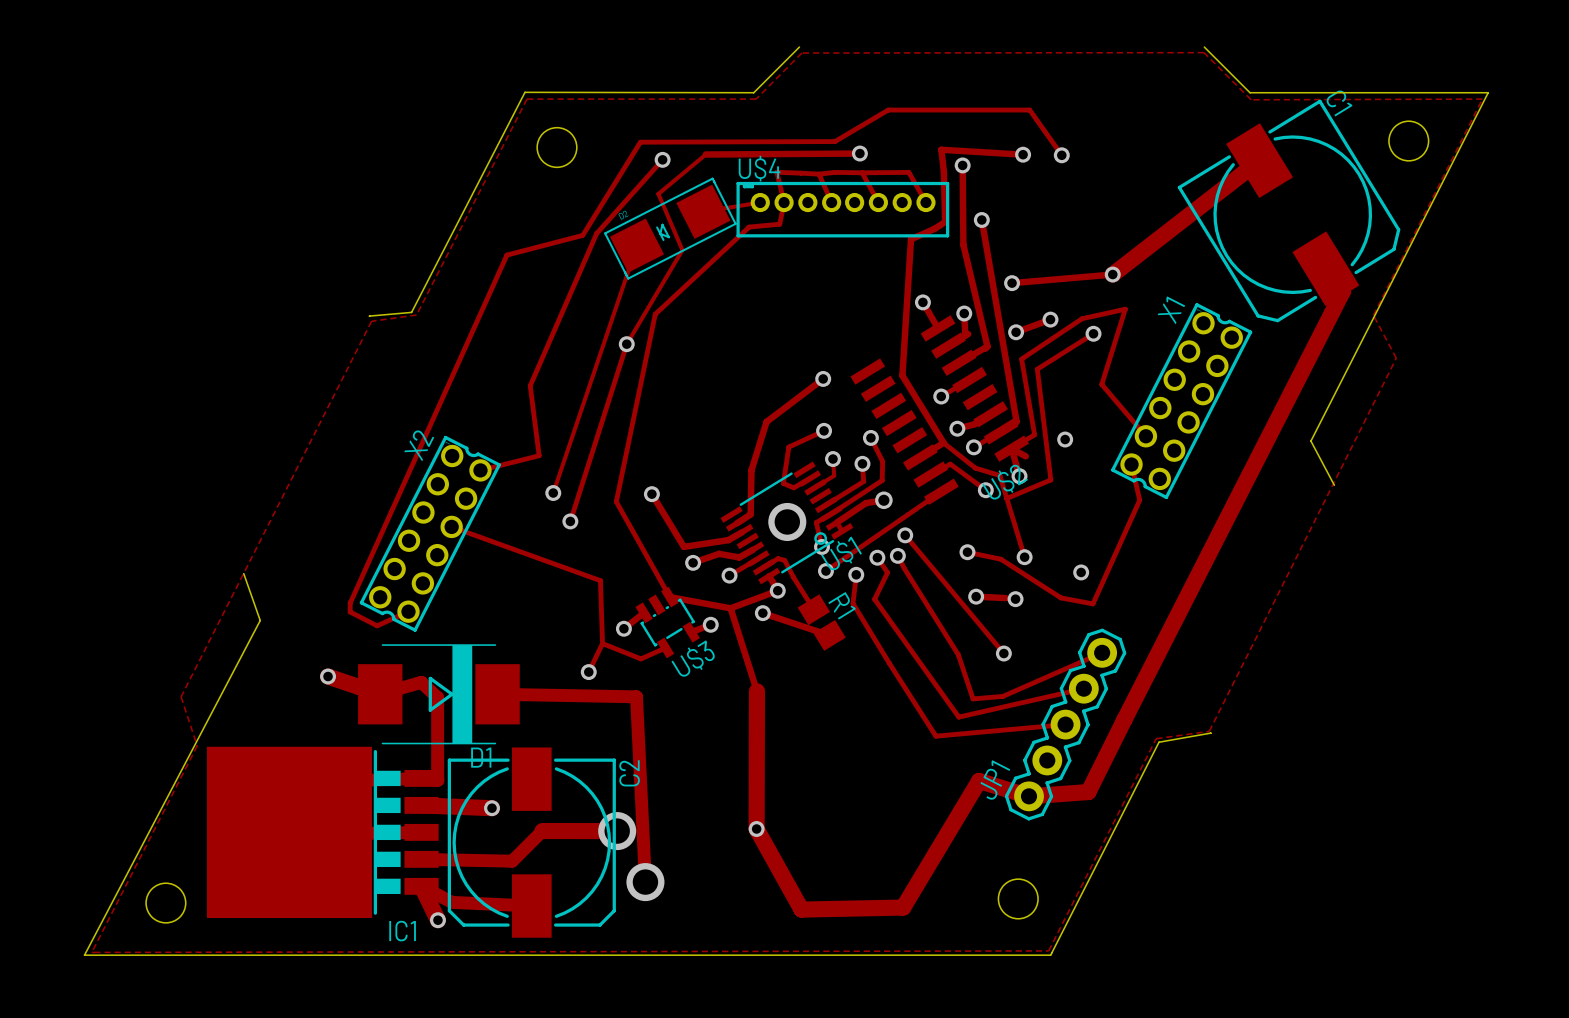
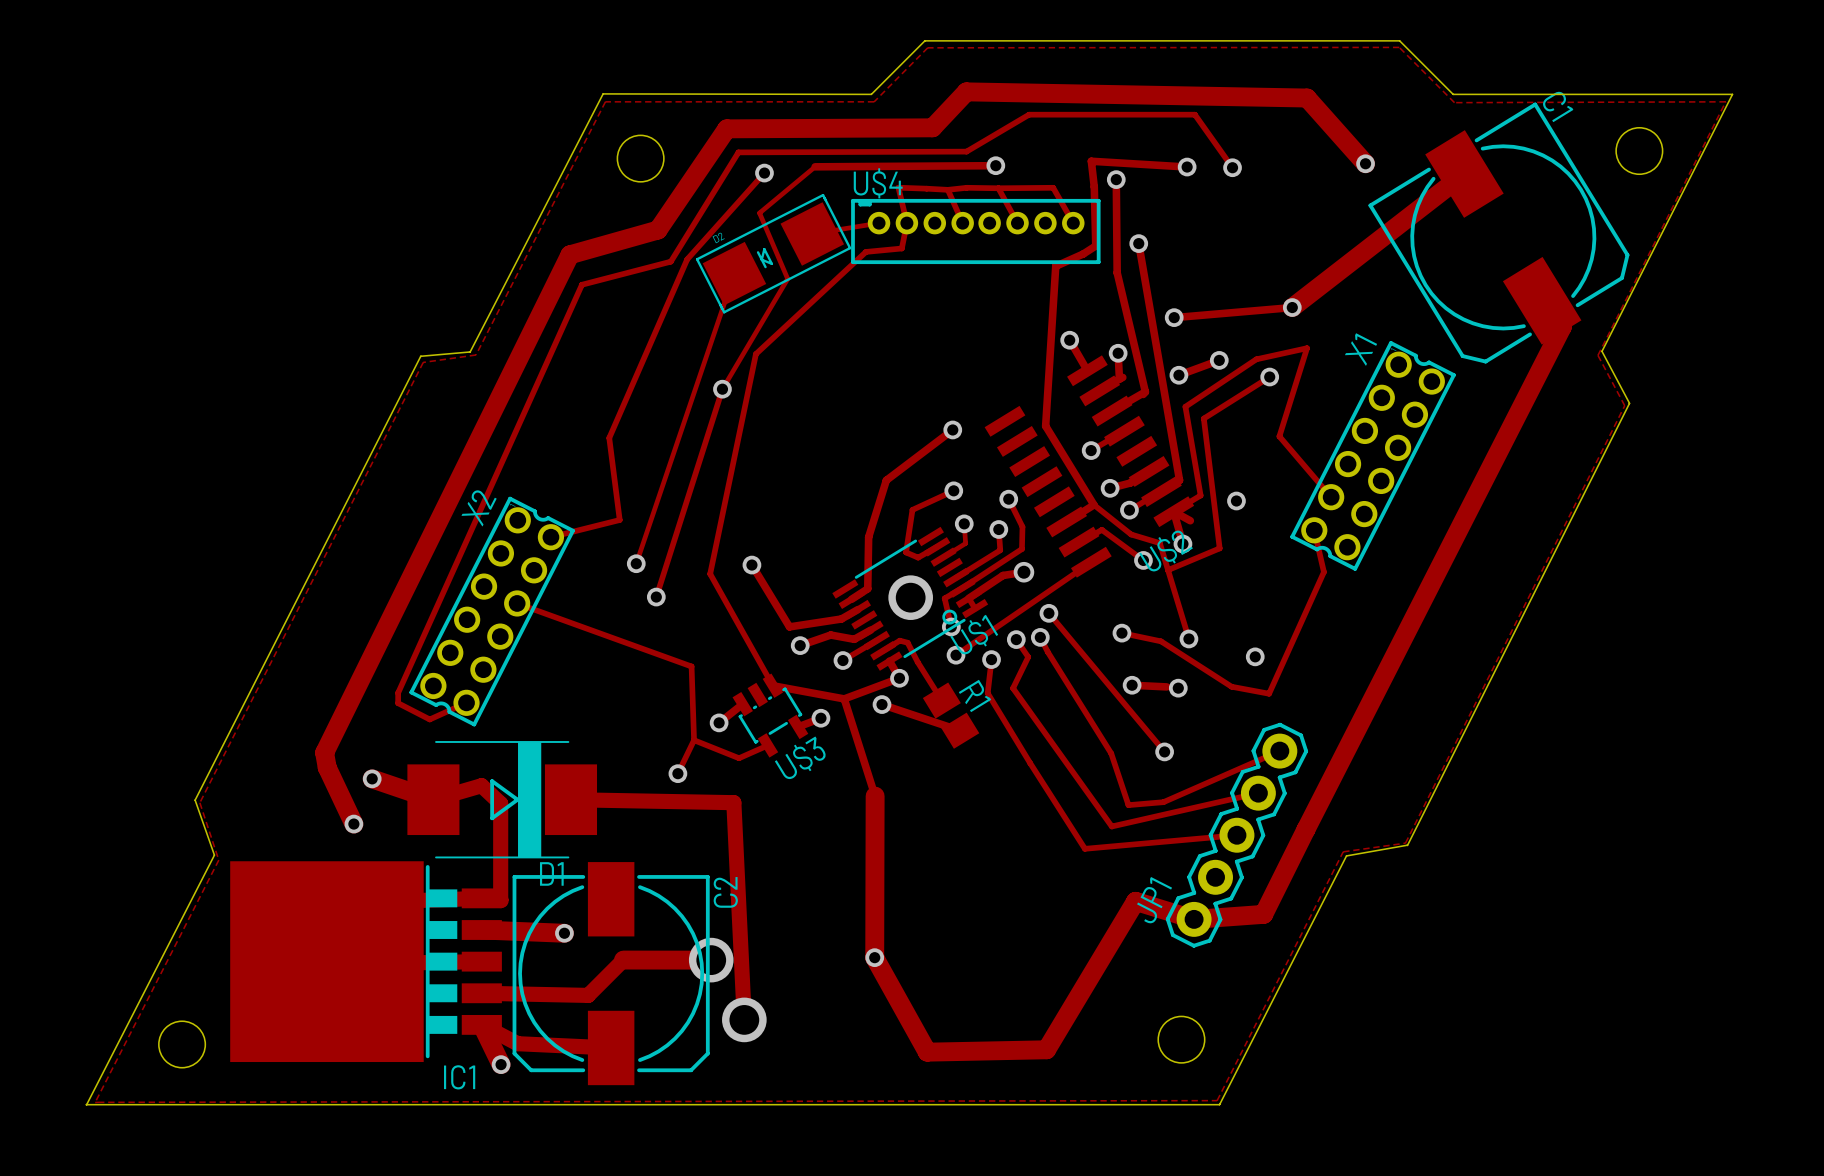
board edge: none -> (924, 40) (1399, 40)
board edge: (1488, 92) (1310, 441) (1334, 485) -> (1732, 94) (1601, 351) (1629, 403)
track: none -> (1365, 163) (1307, 98) (966, 91) (932, 127) (726, 128) (658, 230) (569, 254) (324, 752) (327, 767) (353, 824)
via: none -> (1365, 163)
board edge: none -> (420, 356) (195, 800) (214, 855) (86, 1104)
board edge: none -> (1629, 403) (1407, 845)
board edge: (243, 573) (260, 620) (84, 955) (1050, 955) (1159, 742) -> (86, 1104) (1219, 1104) (1346, 855)
via: none -> (353, 824)

